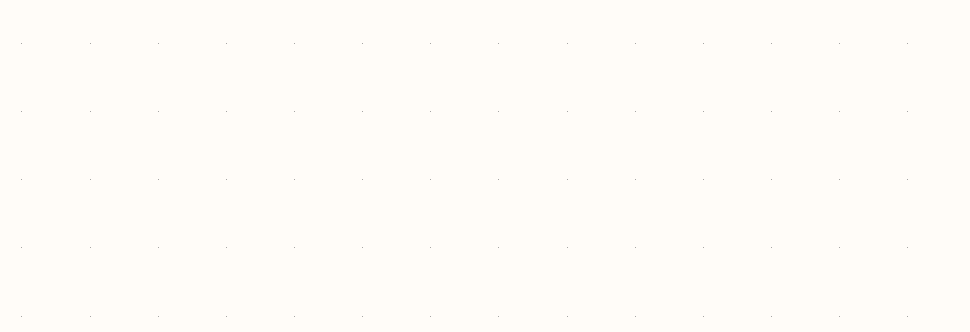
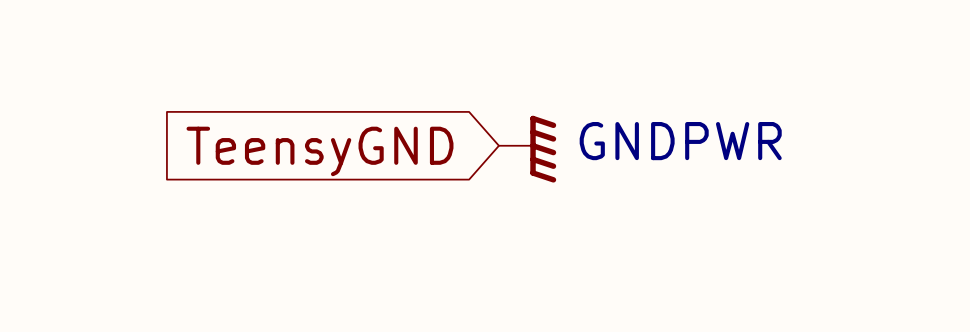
power symbol: none -> GNDPWR (527, 149)
global label: none -> TeensyGND (320, 151)

